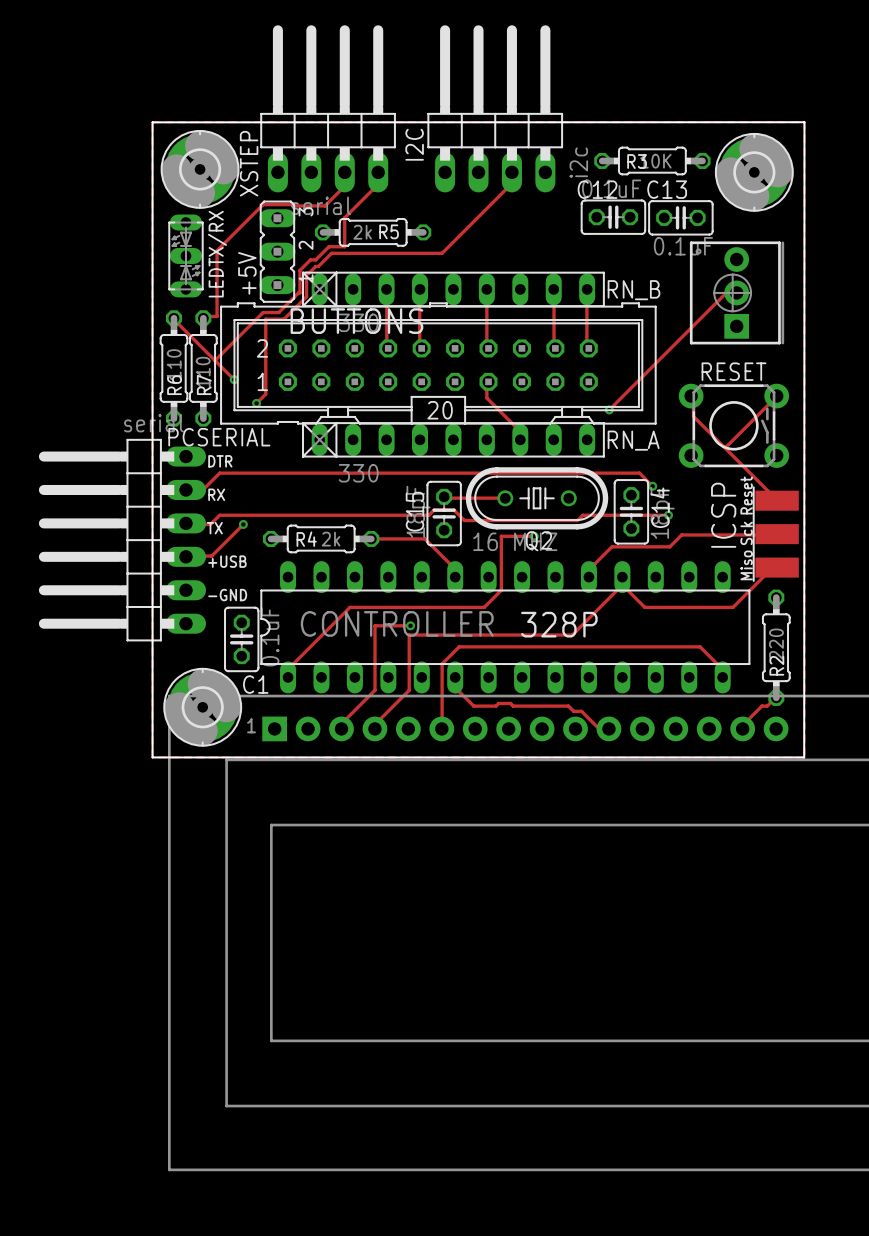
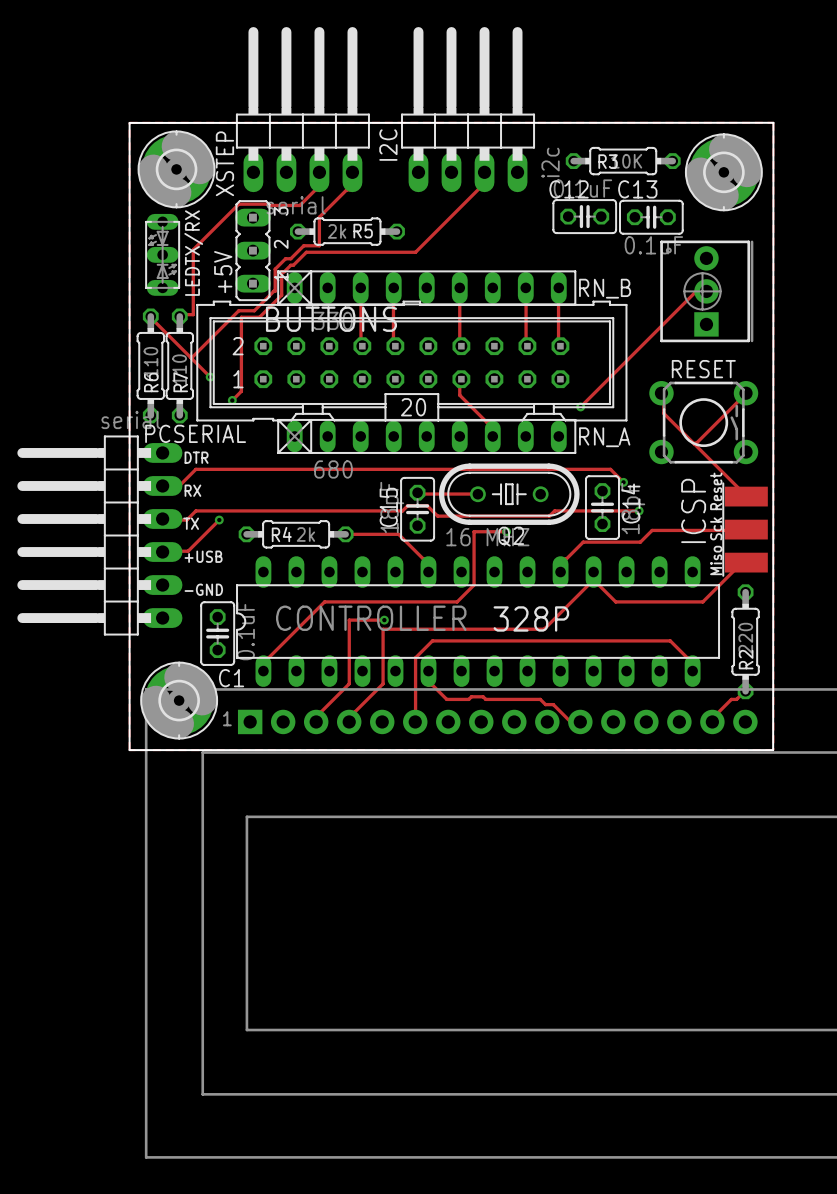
RN_A value: 330 (358, 473) -> 680 (333, 469)

